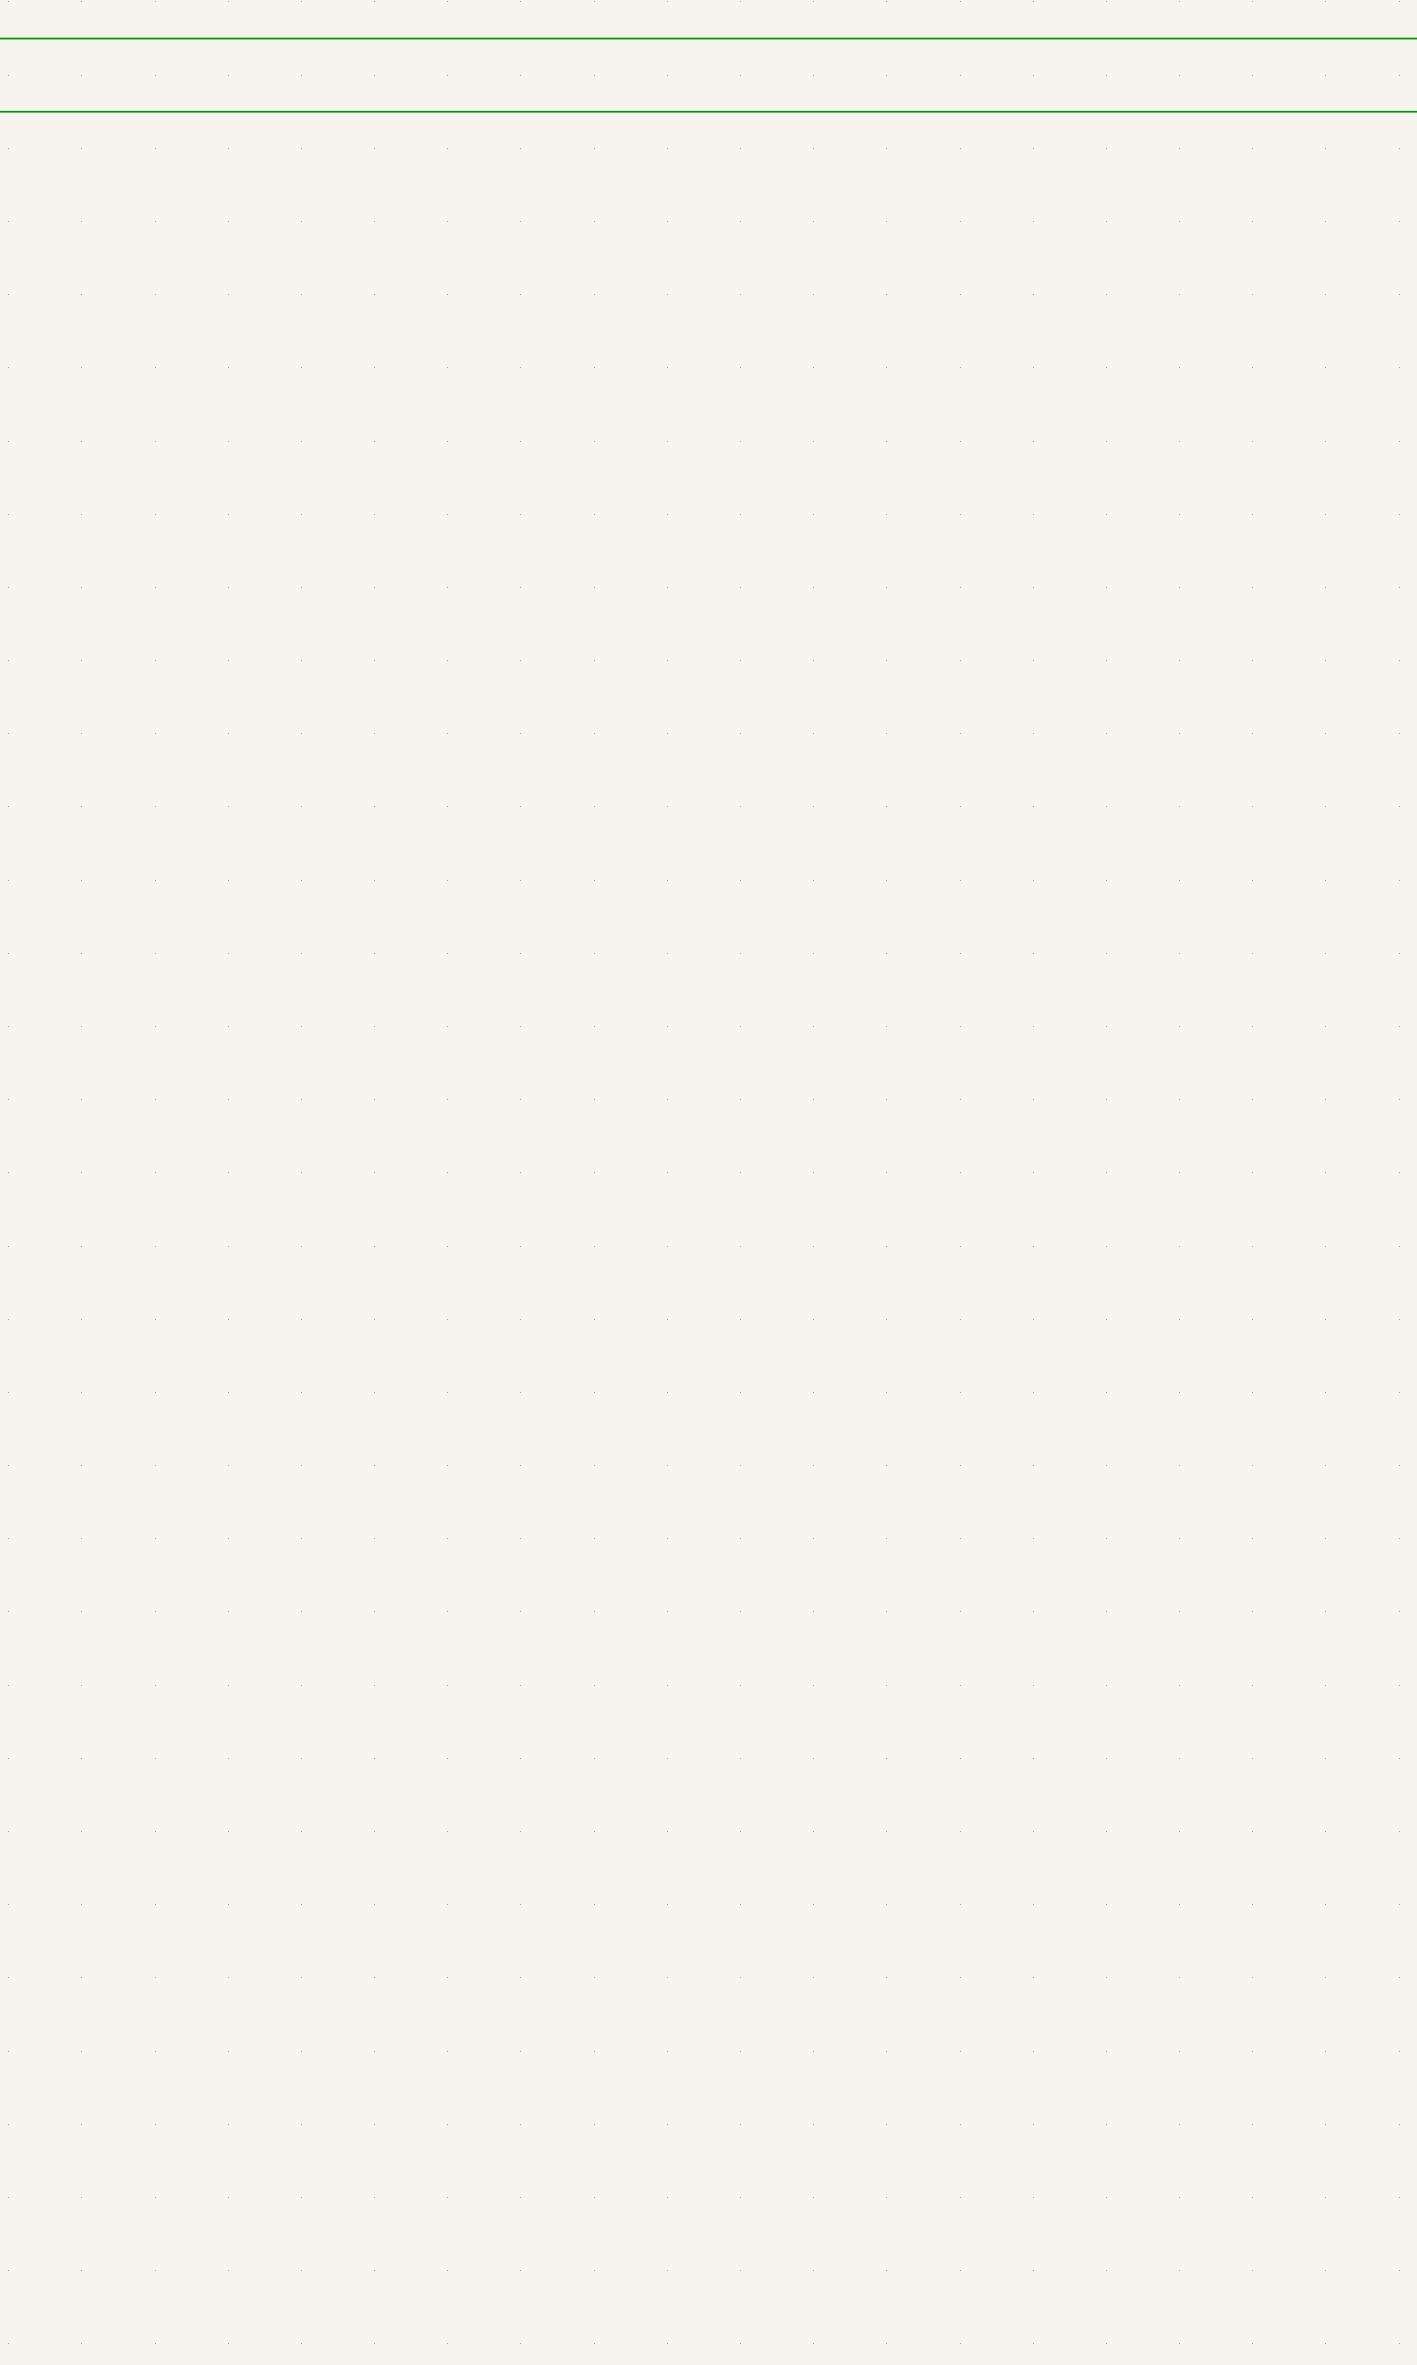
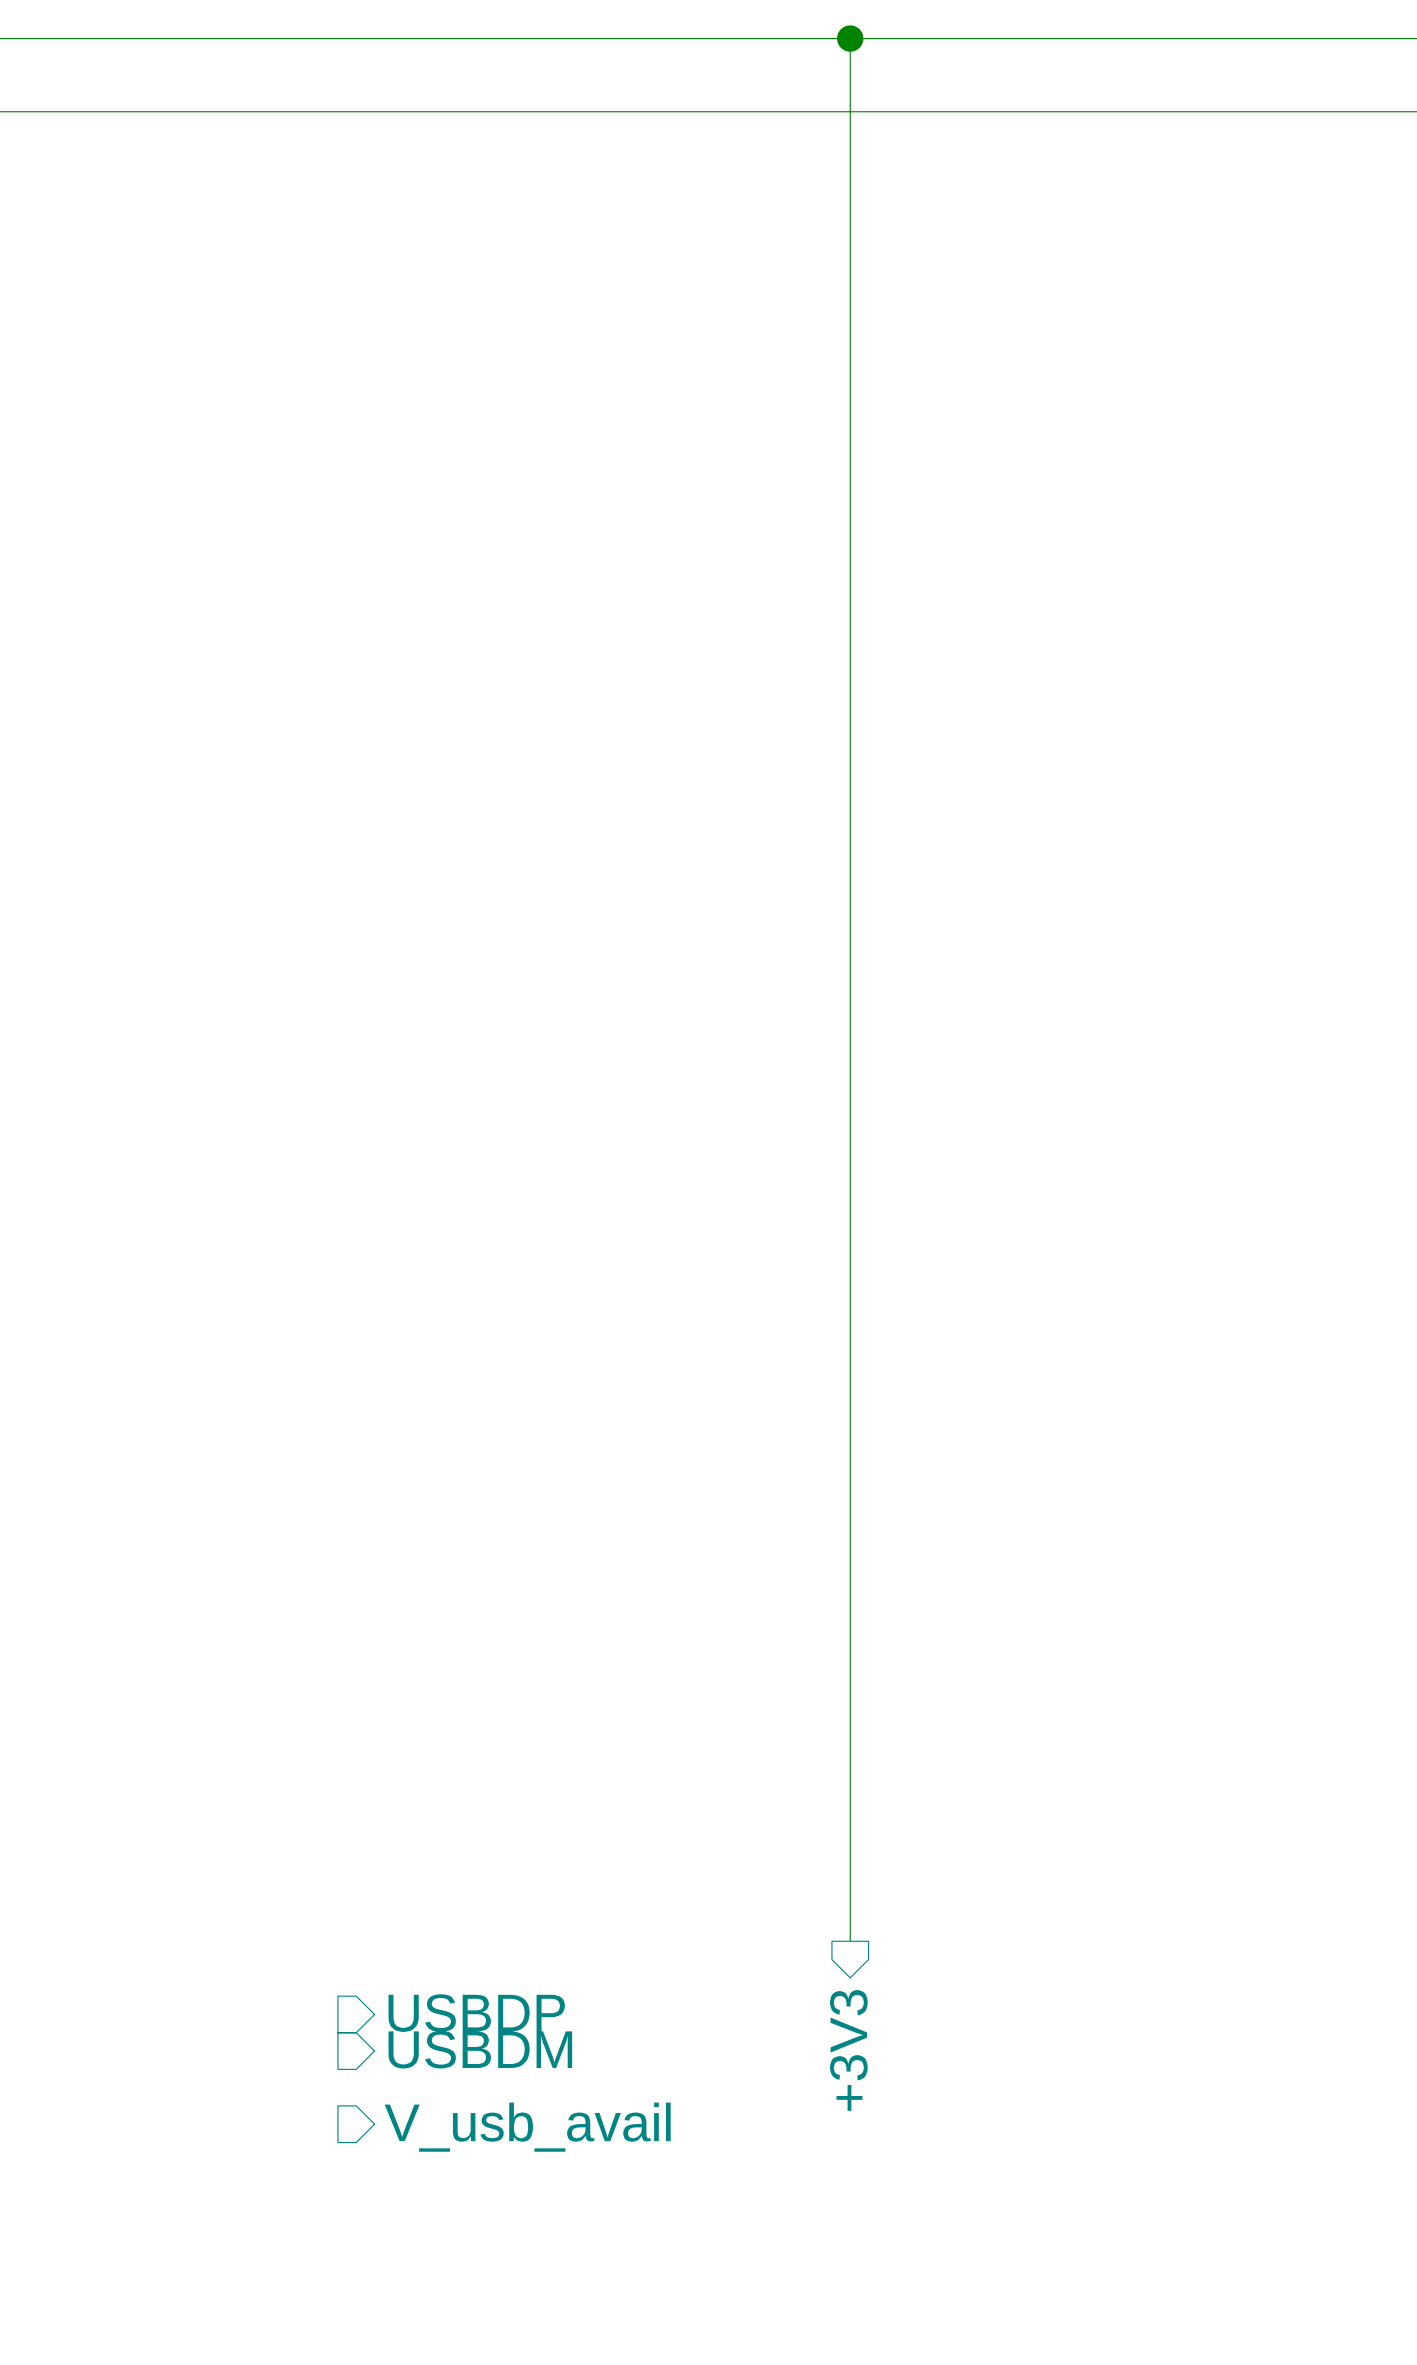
wire: none -> (850, 38) (850, 1941)
junction: none -> (850, 38)
sheet pin: none -> USBDP (476, 2013)
sheet pin: none -> USBDM (480, 2049)
sheet pin: none -> +3V3 (848, 2050)
sheet pin: none -> V_usb_avail (527, 2127)

